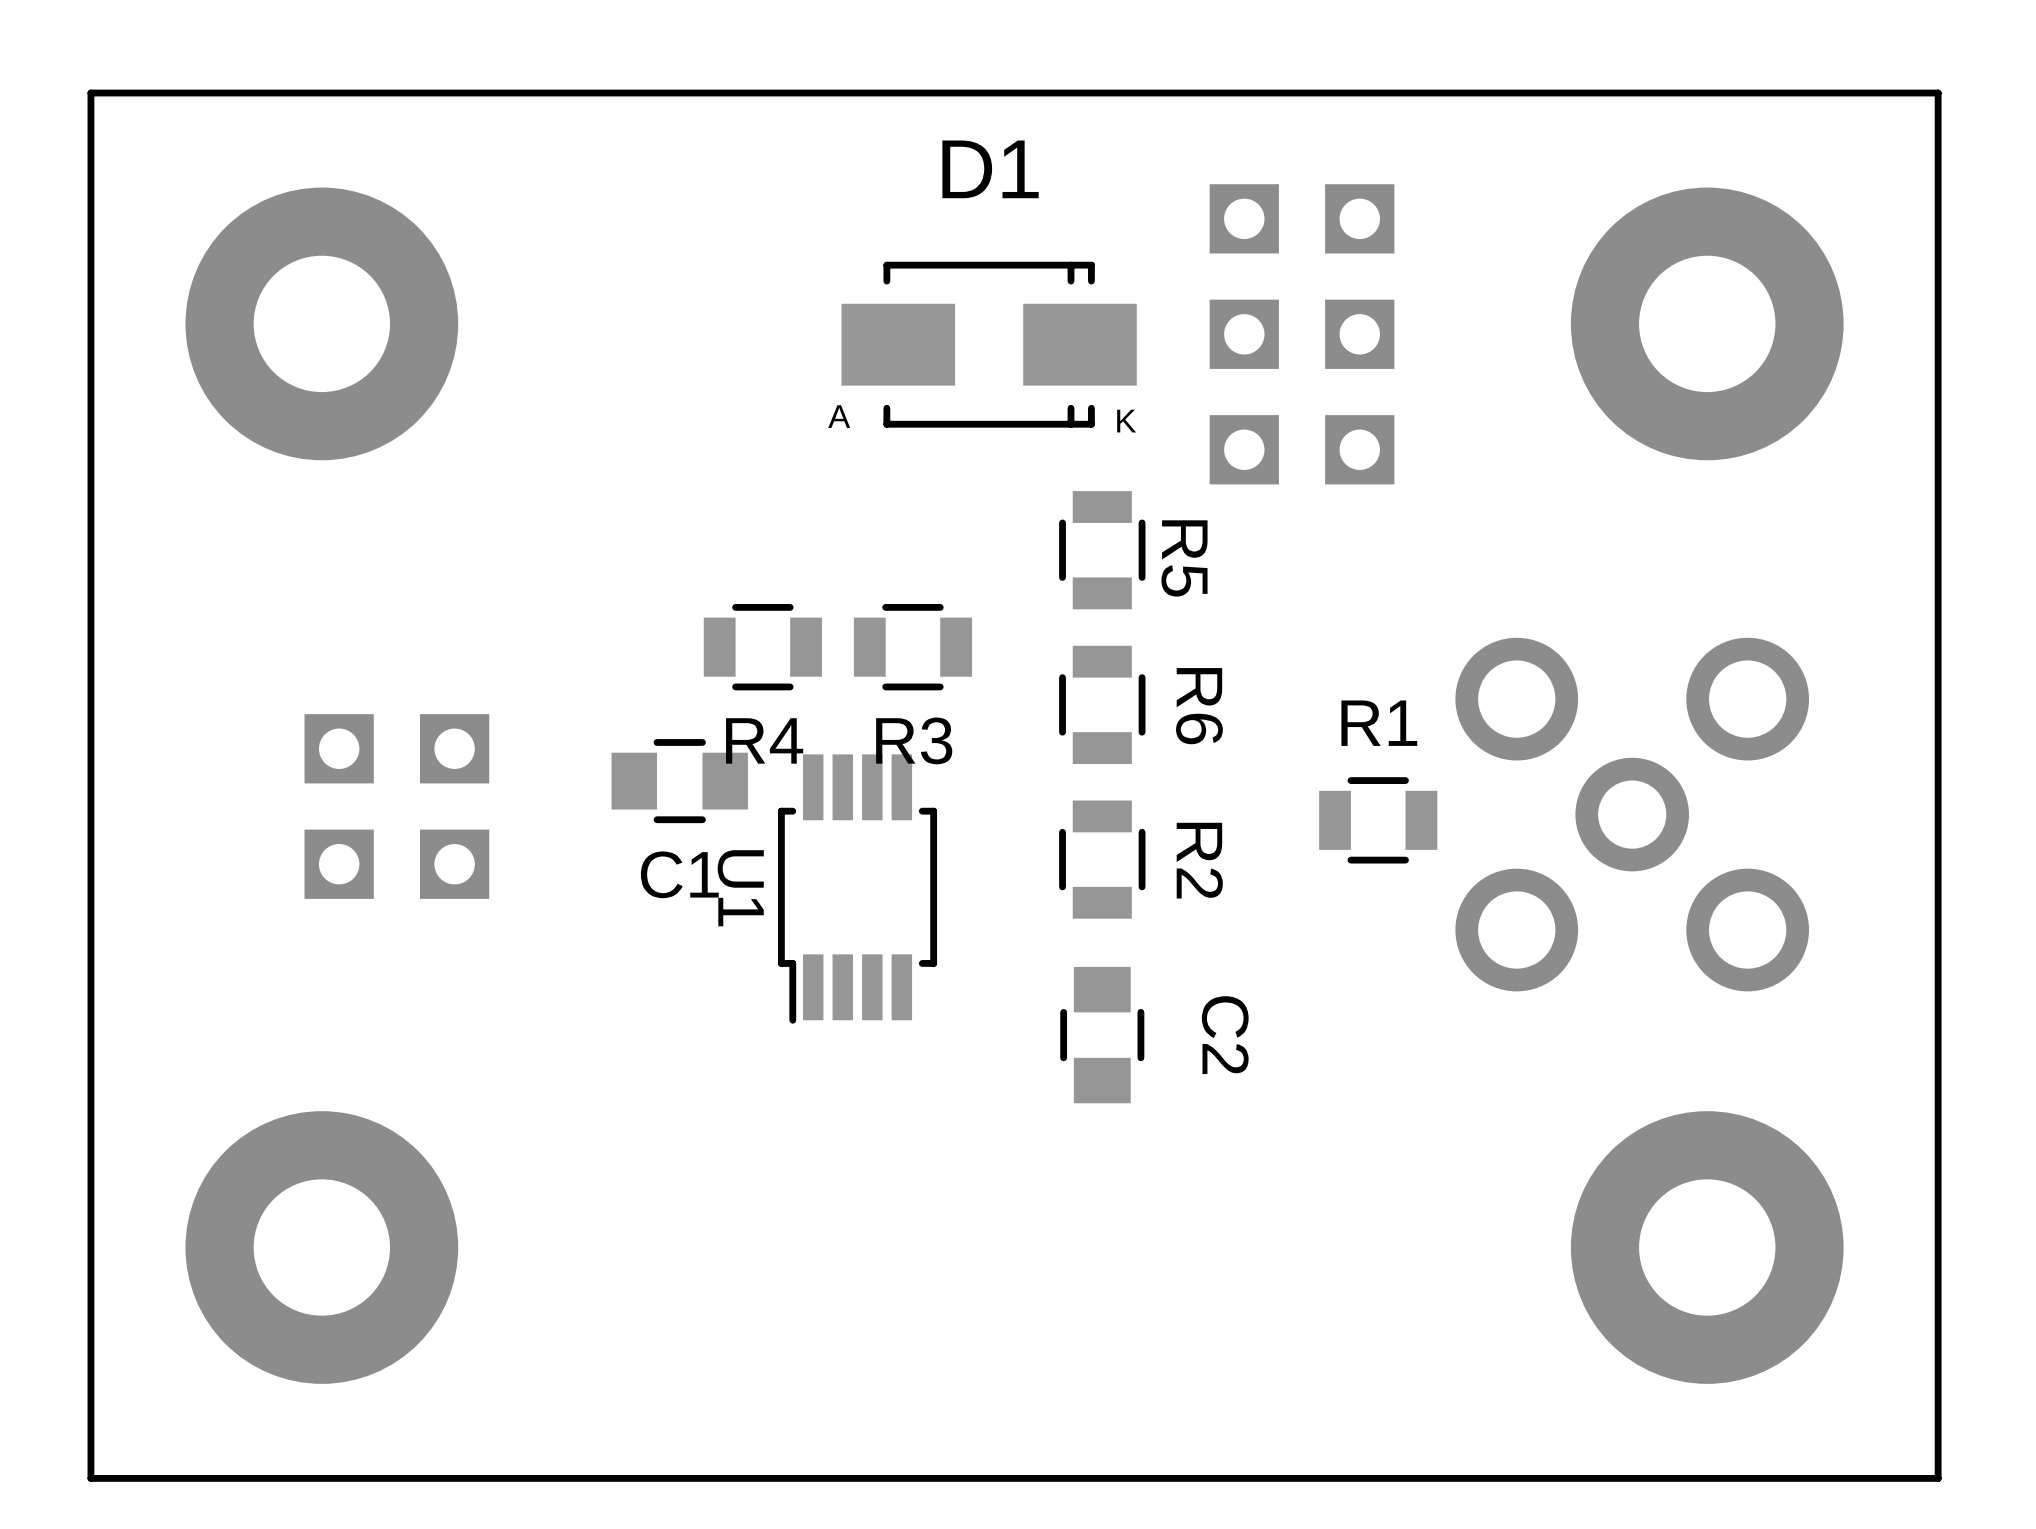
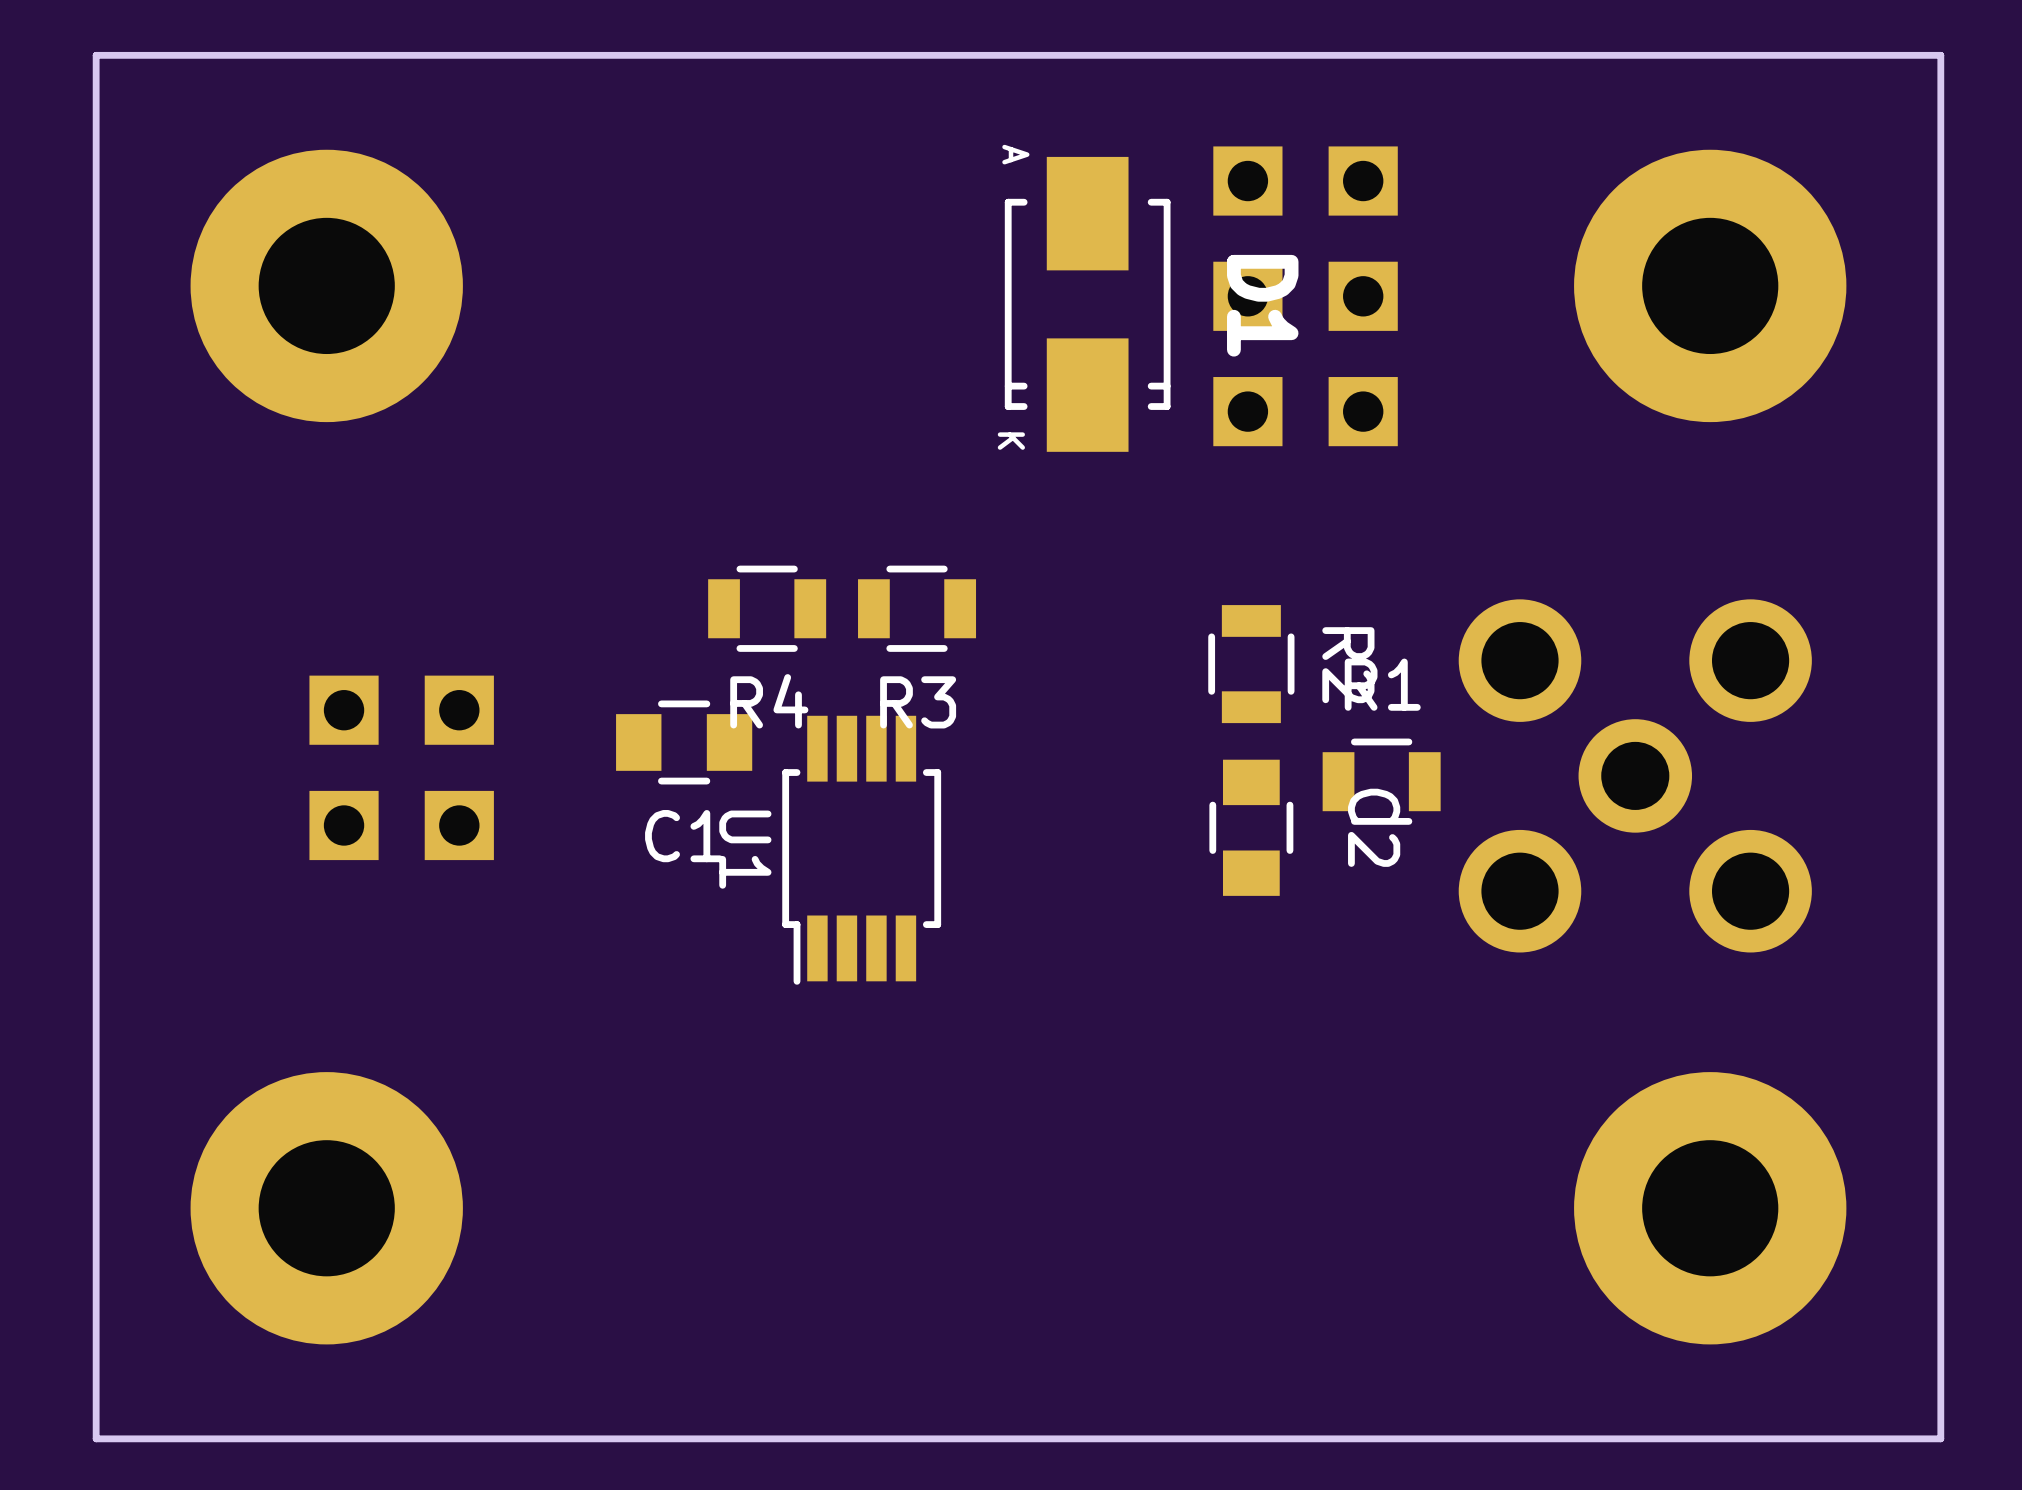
D1 rotation: 0° (989, 344) -> 90° clockwise (1087, 304)
R5: (1102, 550) -> none
R6: (1102, 704) -> none
R2 position: (1102, 859) -> (1251, 664)
C2 position: (1102, 1035) -> (1251, 827)

